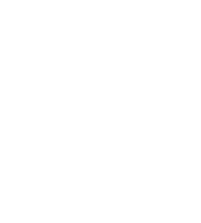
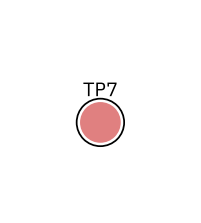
TP7: none -> (100, 122)

